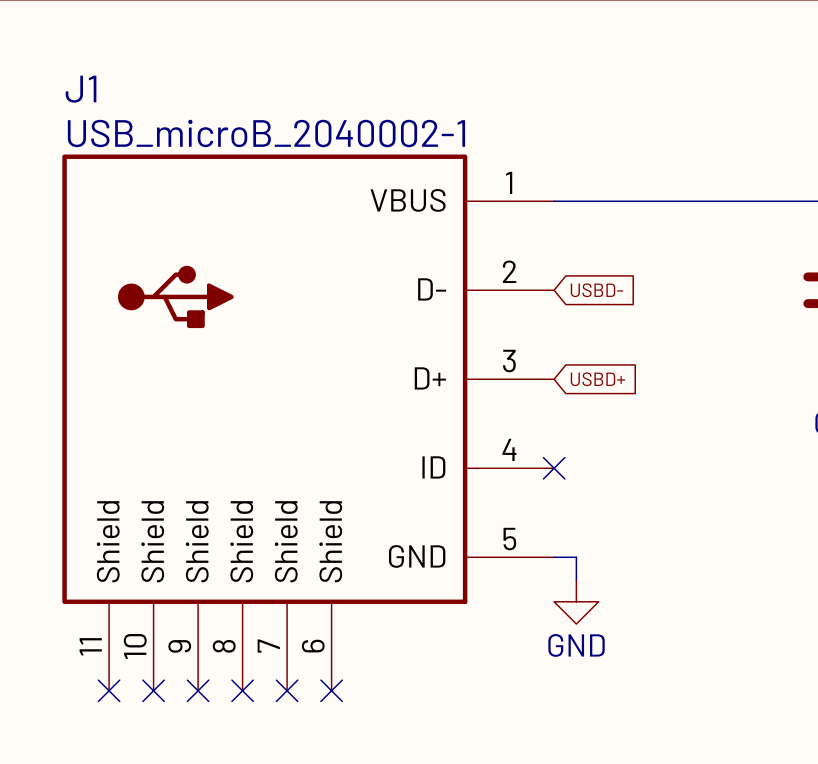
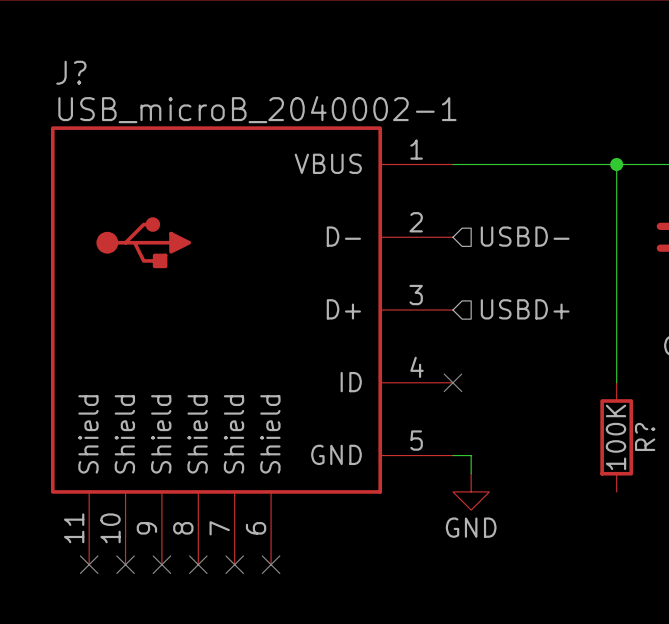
J1 name: J1 (81, 89) -> J? (71, 72)
wire: none -> (616, 164) (616, 382)
junction: none -> (616, 164)
hierarchical label: none -> USBD- (525, 236)
global label: USBD- (596, 290) -> none
hierarchical label: none -> USBD+ (525, 309)
global label: USBD+ (597, 379) -> none
R?: none -> 100K (616, 437)

